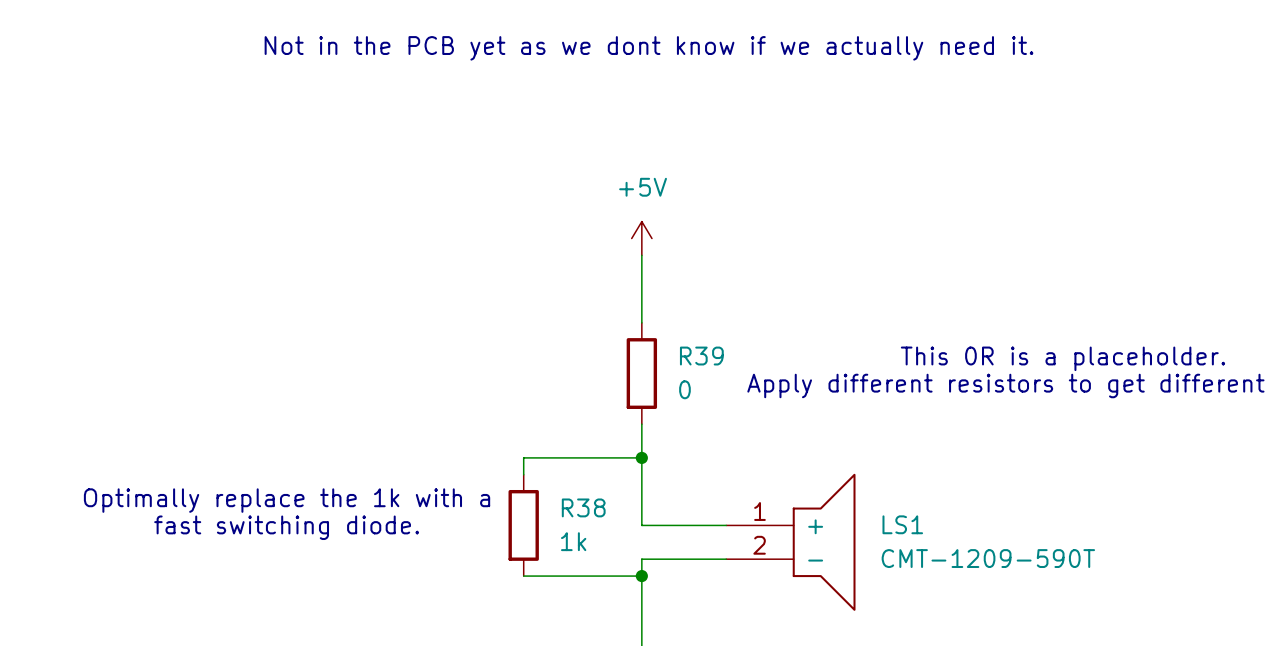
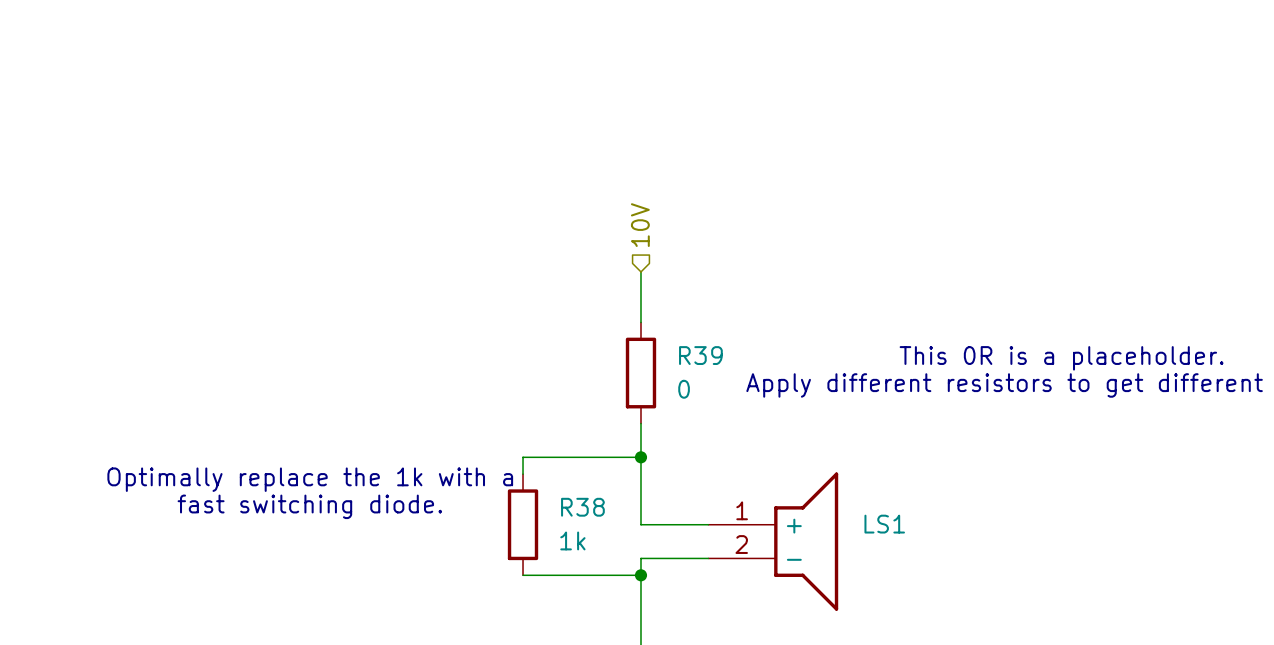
text: Not in the PCB yet as we dont know if we actually need it. (649, 48) -> none
hierarchical label: none -> 10V (640, 225)
power symbol: +5V (641, 238) -> none
wire: (641, 255) (641, 272) -> none
LS1 symbol: [726, 473, 856, 611] -> [708, 472, 839, 611]
text position: Optimally replace the 1k with a (287, 500) -> Optimally replace the 1k with a (310, 479)
text position: fast switching diode. (286, 527) -> fast switching diode. (309, 506)
LS1 text: CMT-1209-590T (988, 558) -> none

